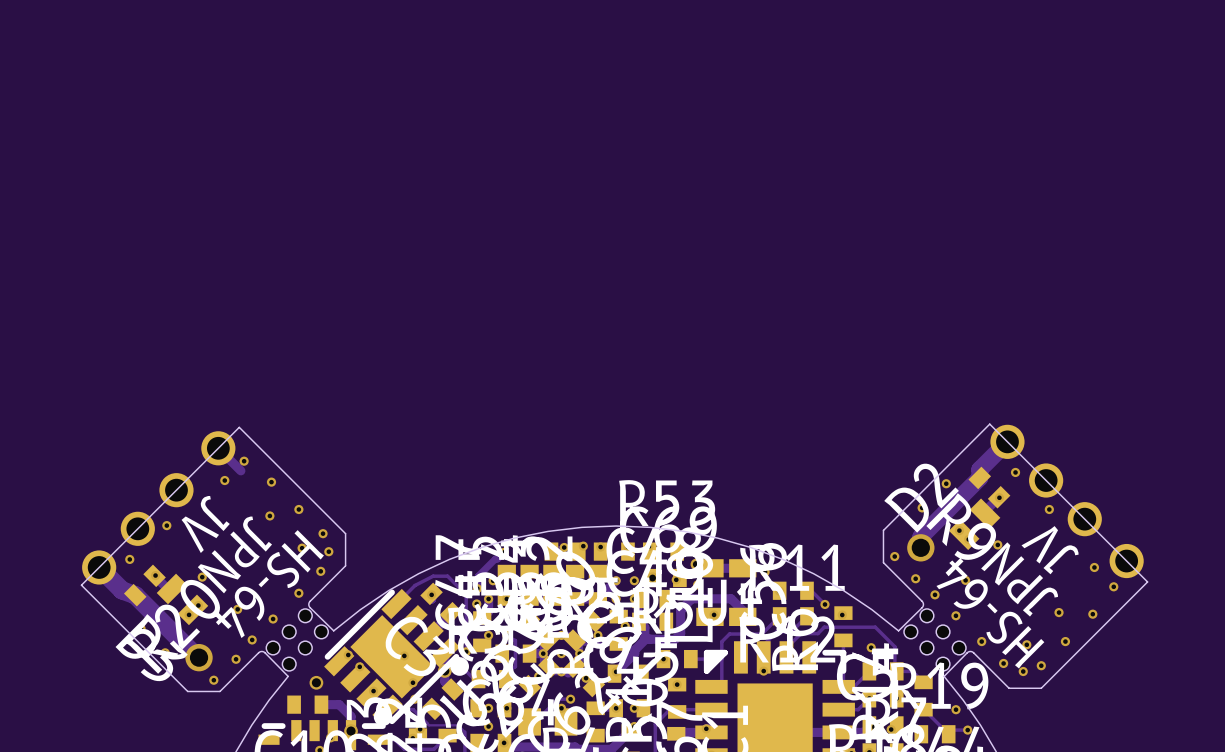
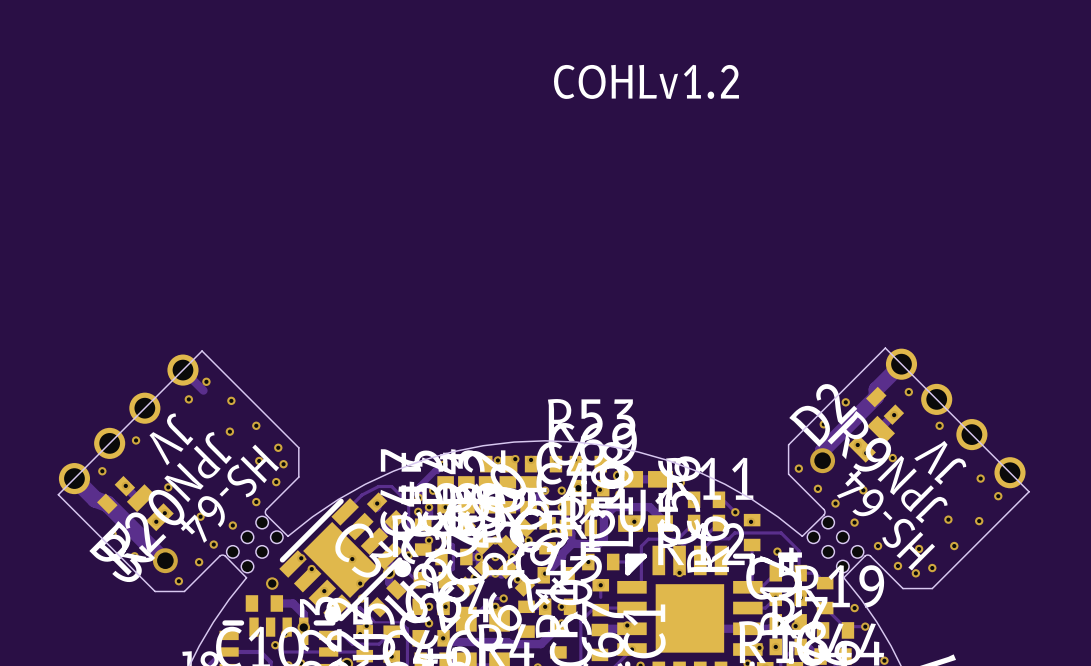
text: none -> COHLv1.2 (646, 81)
track: none -> (600, 585) (600, 597)

